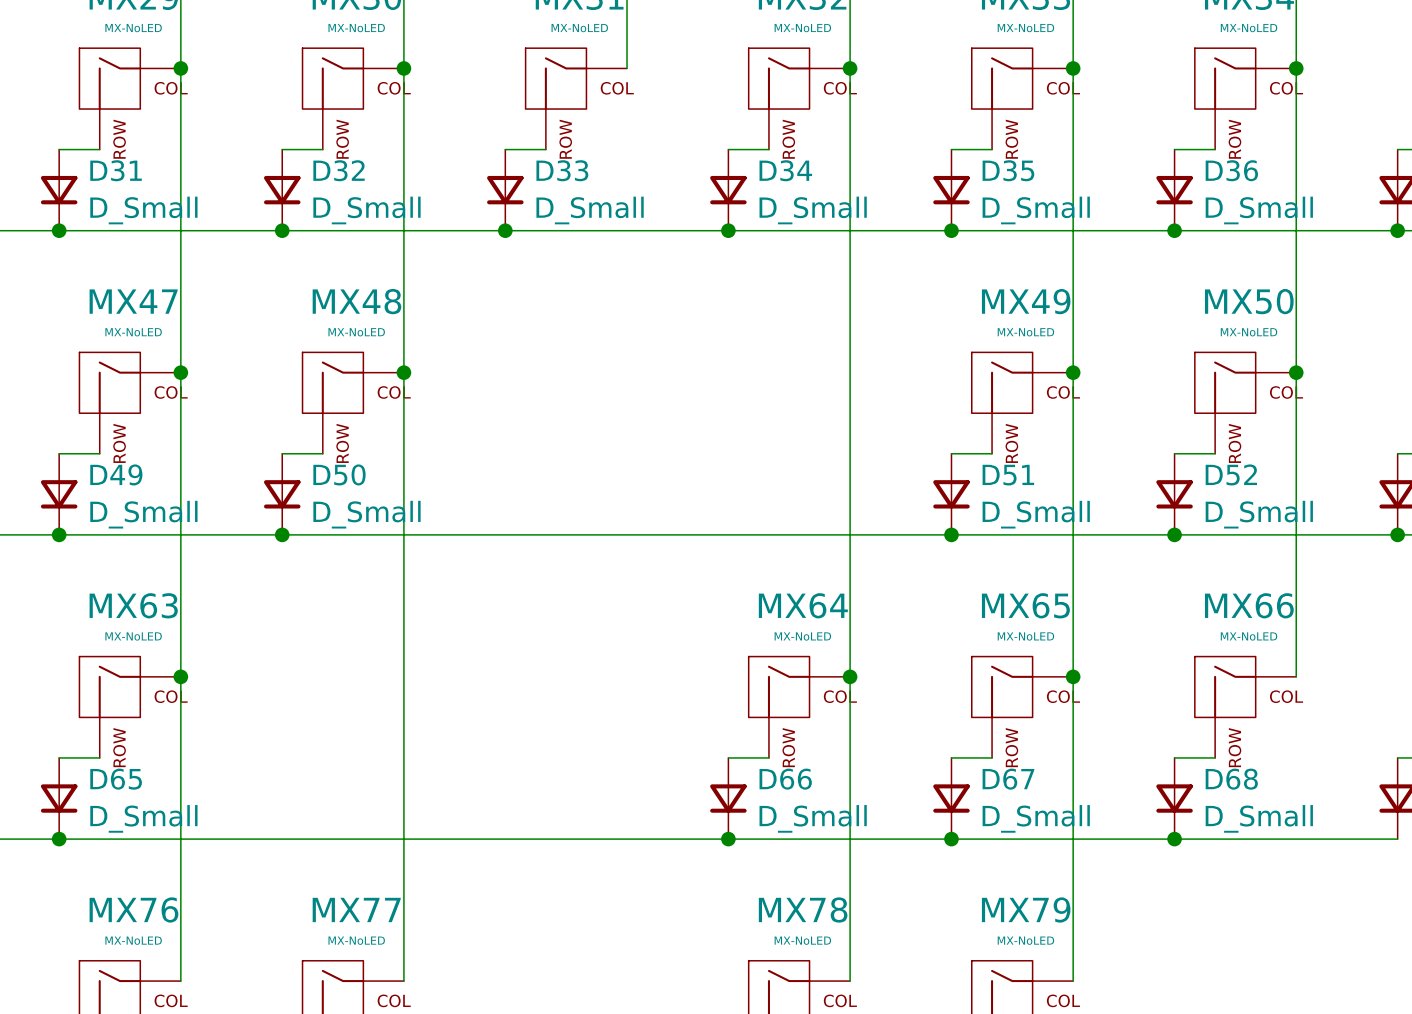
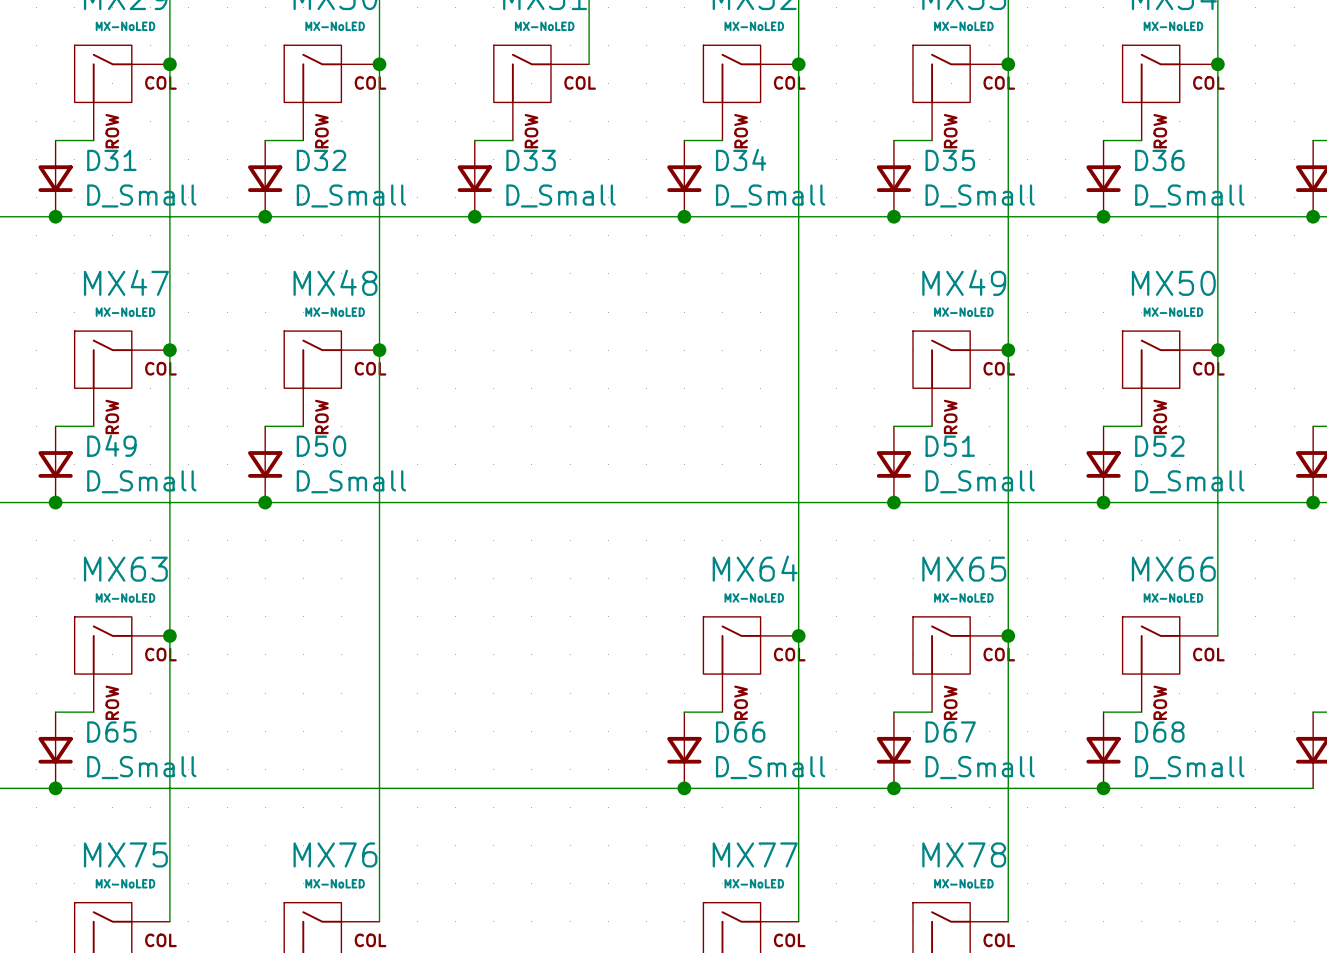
MX76 name: MX76 (133, 909) -> MX75 (125, 854)
MX77 name: MX77 (356, 909) -> MX76 (335, 854)
MX78 name: MX78 (803, 909) -> MX77 (755, 854)
MX79 name: MX79 (1026, 909) -> MX78 (964, 854)

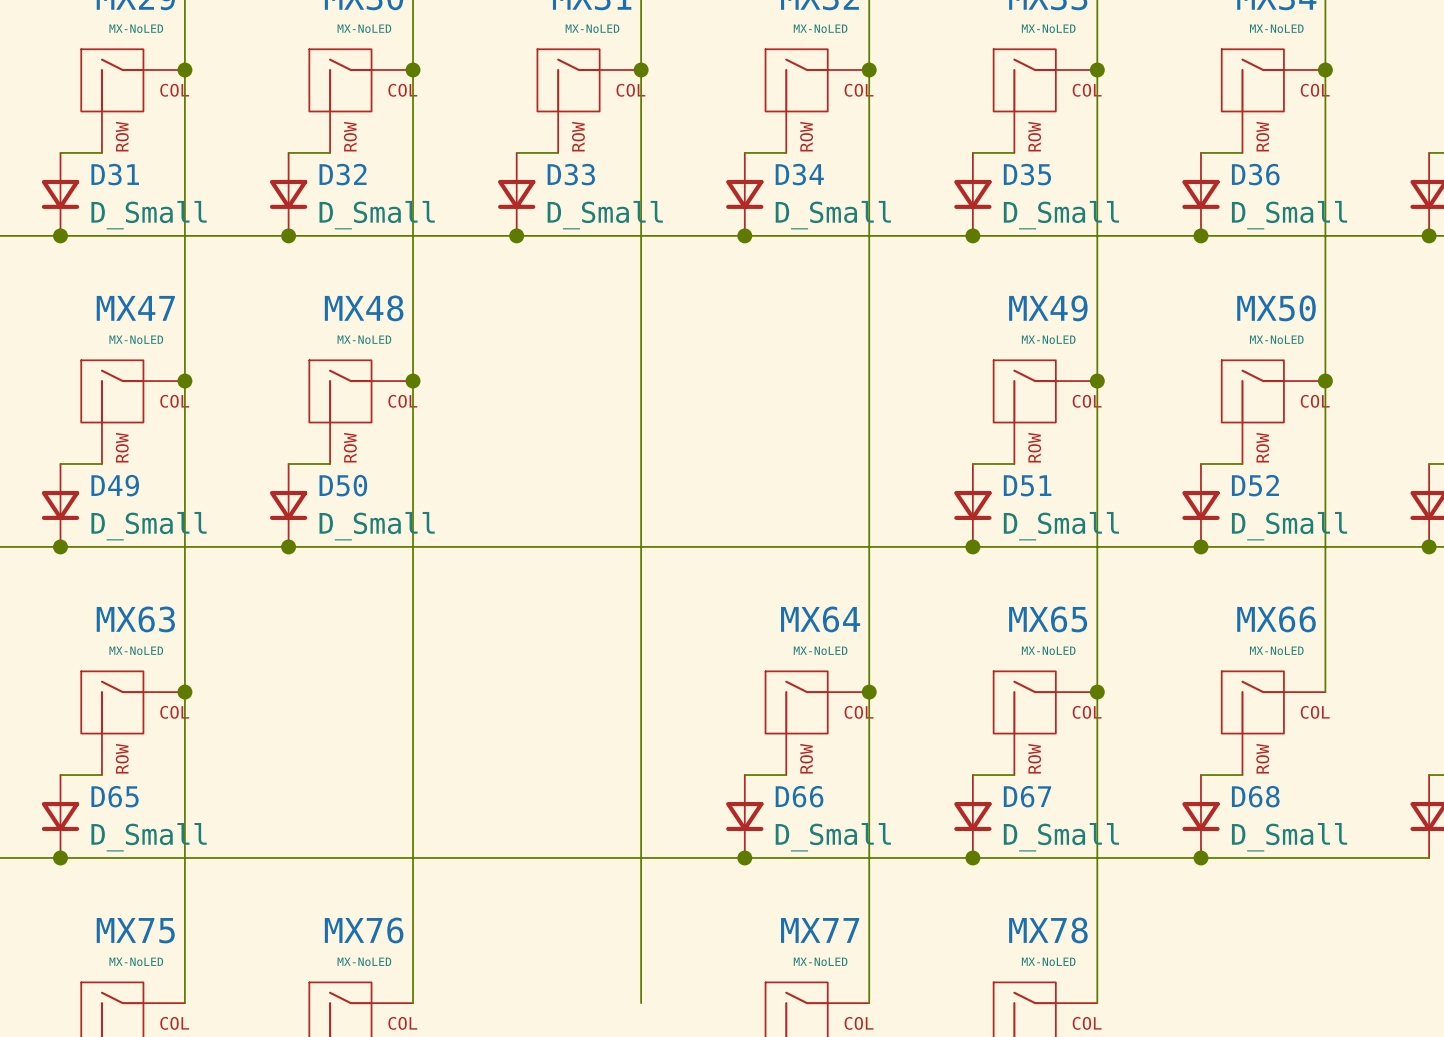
wire: none -> (641, 70) (641, 1003)
junction: none -> (641, 70)

